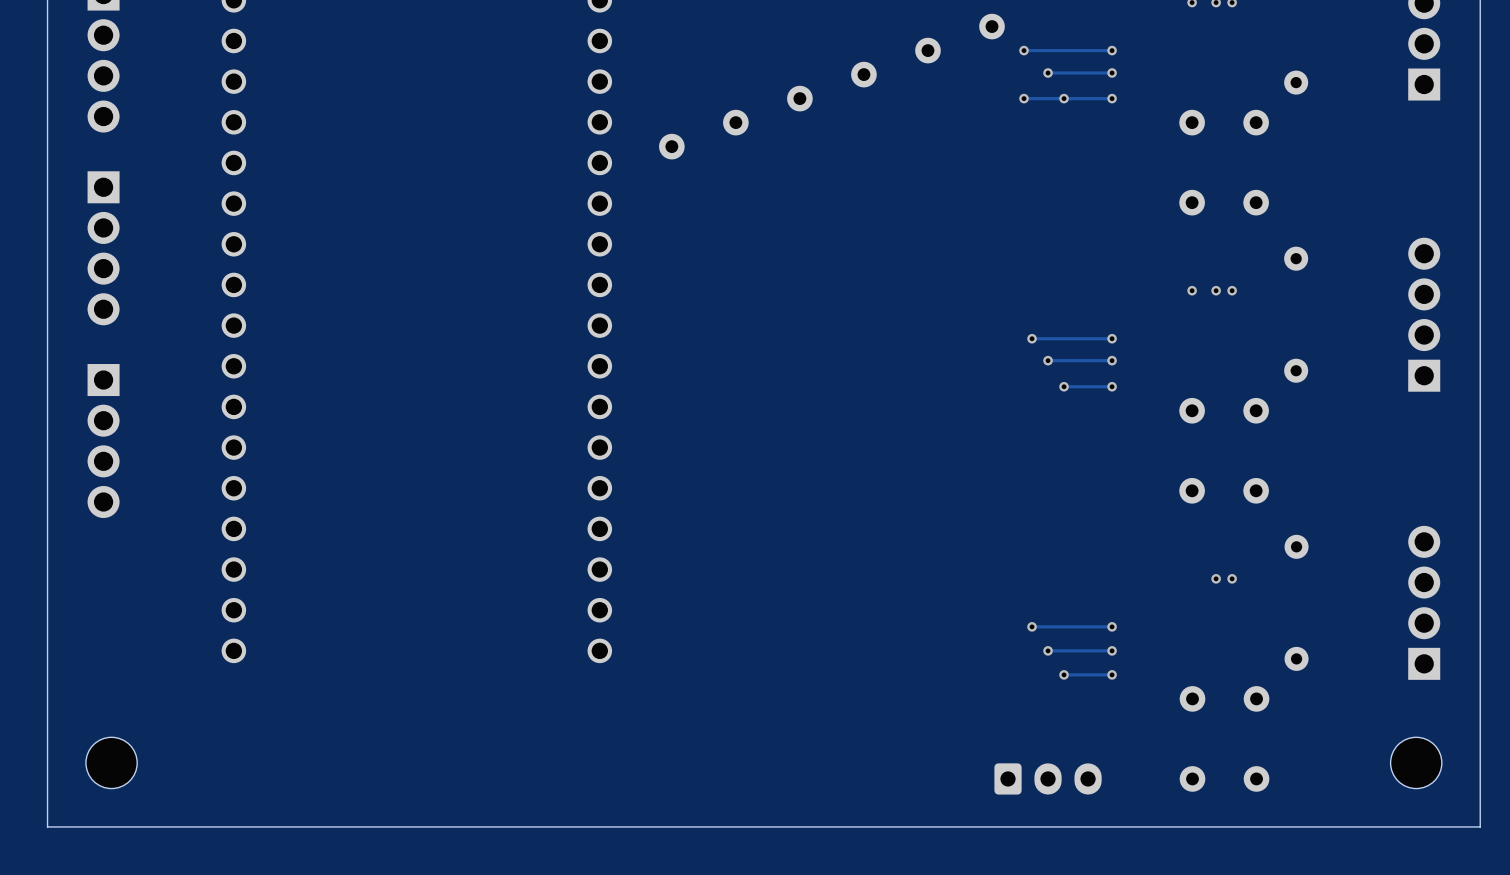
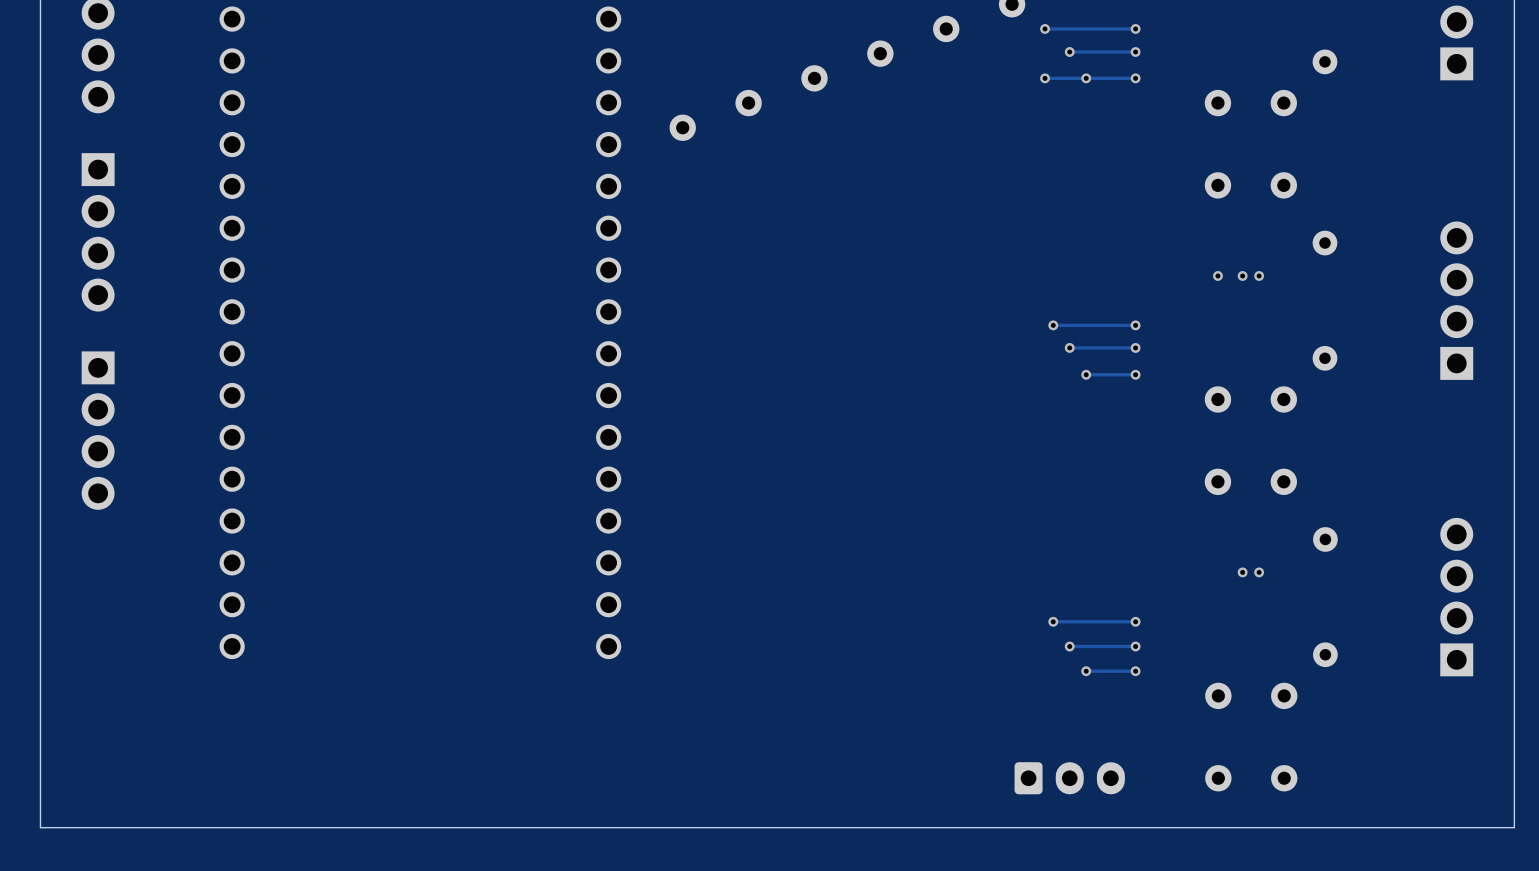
part: (111, 762) -> none
part: (1416, 762) -> none

